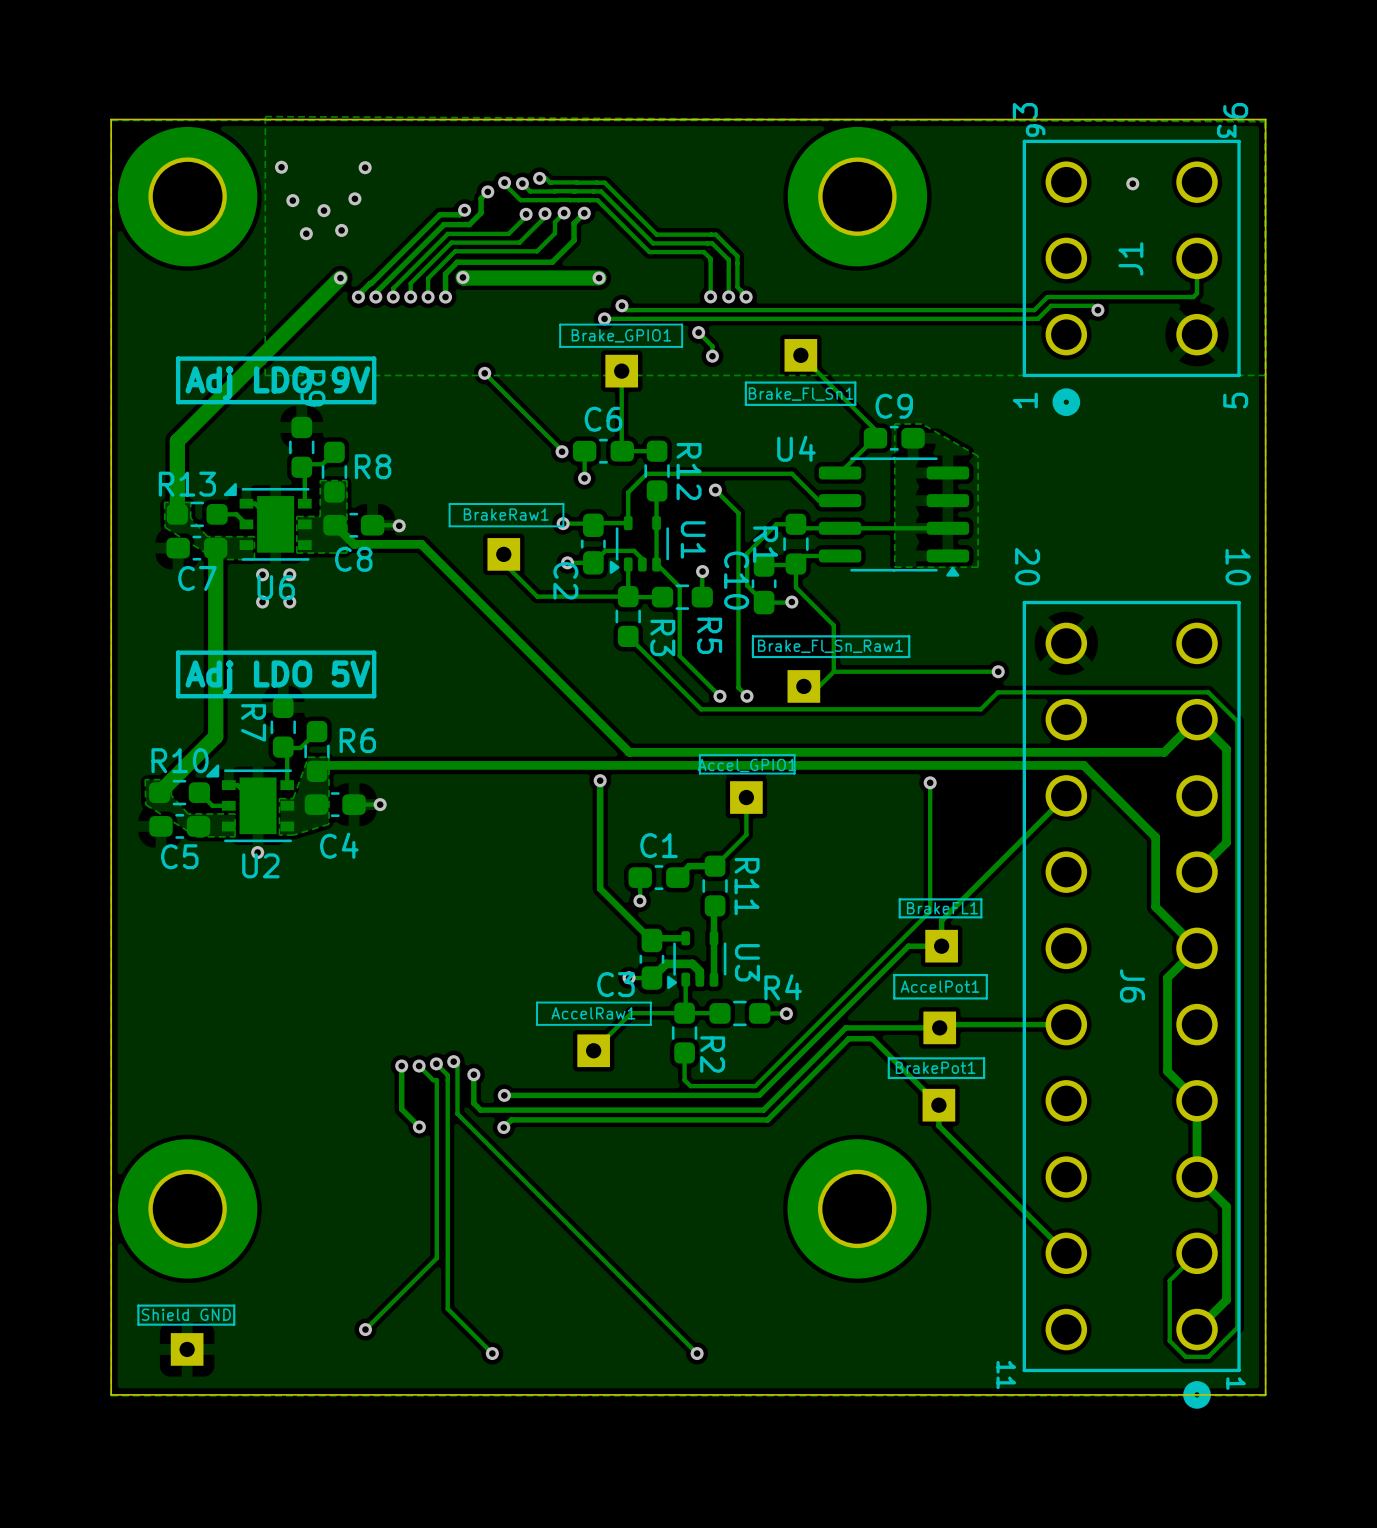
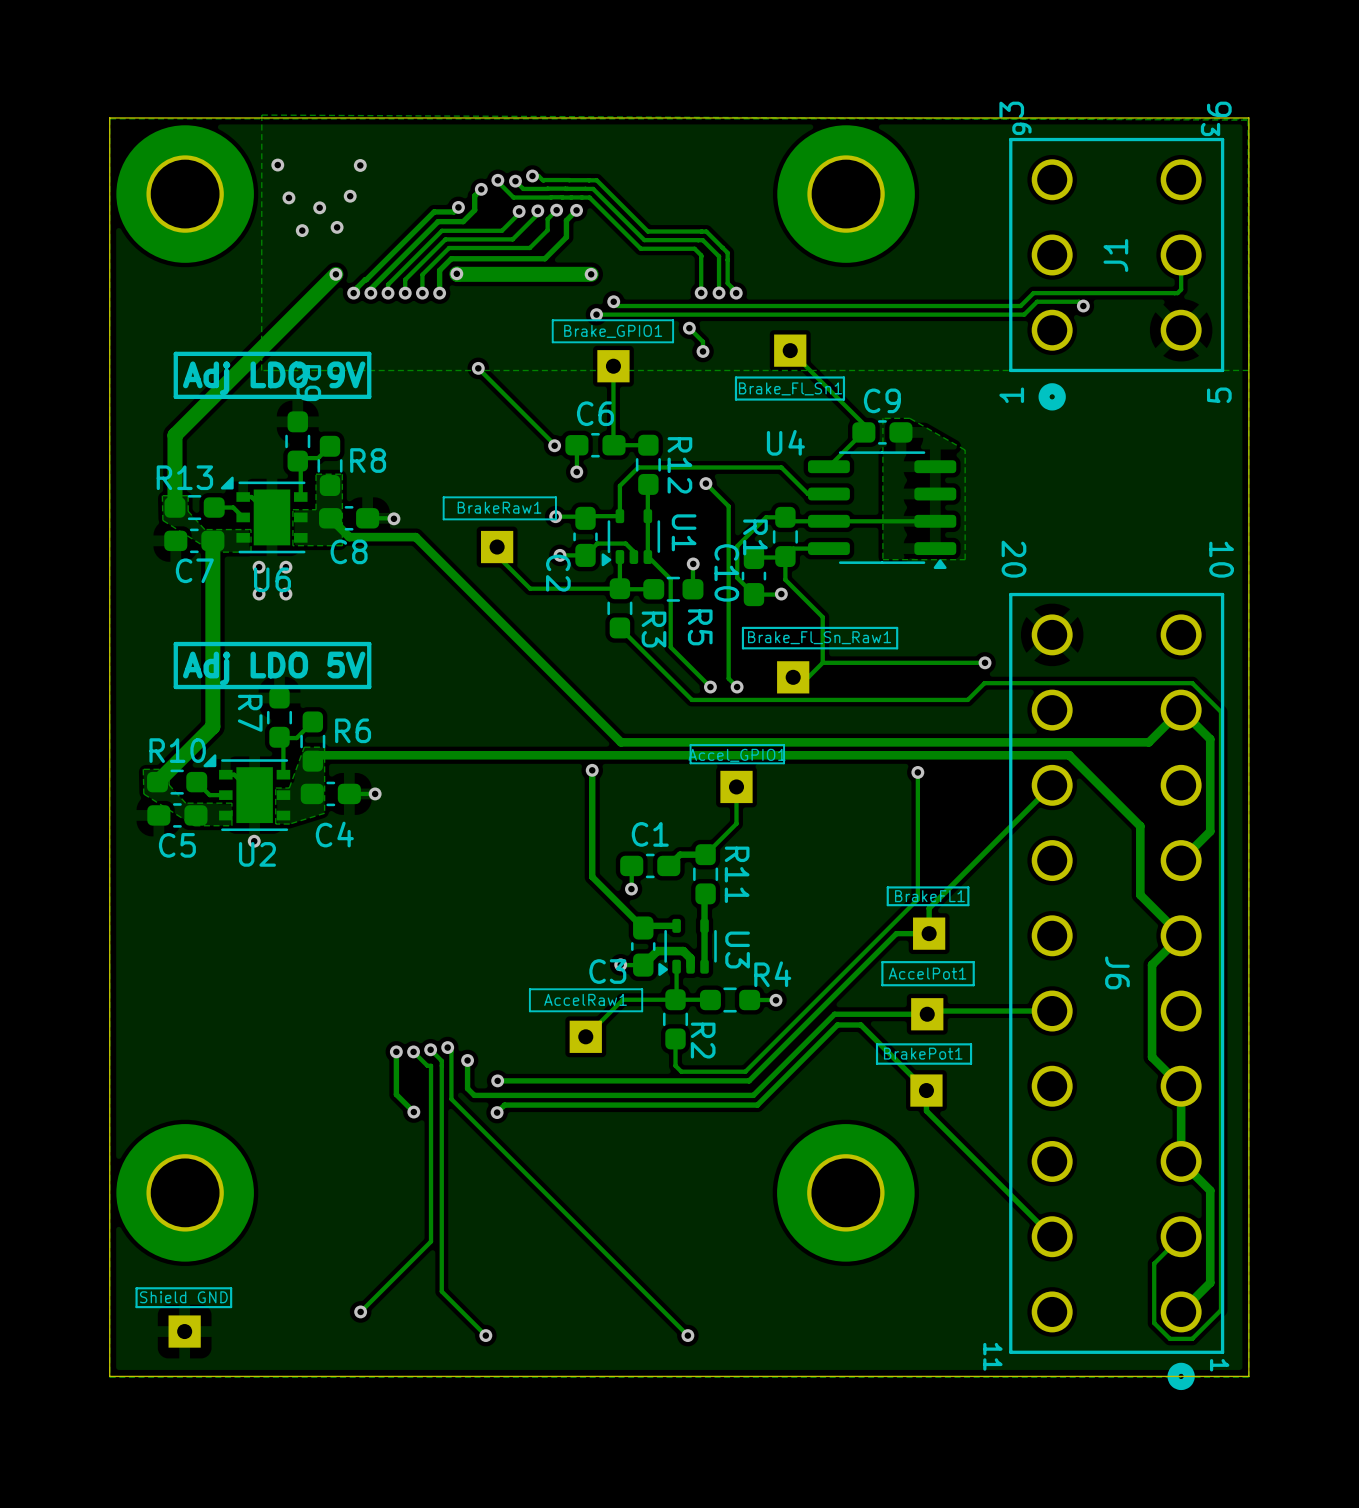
via: (1132, 183) -> none

